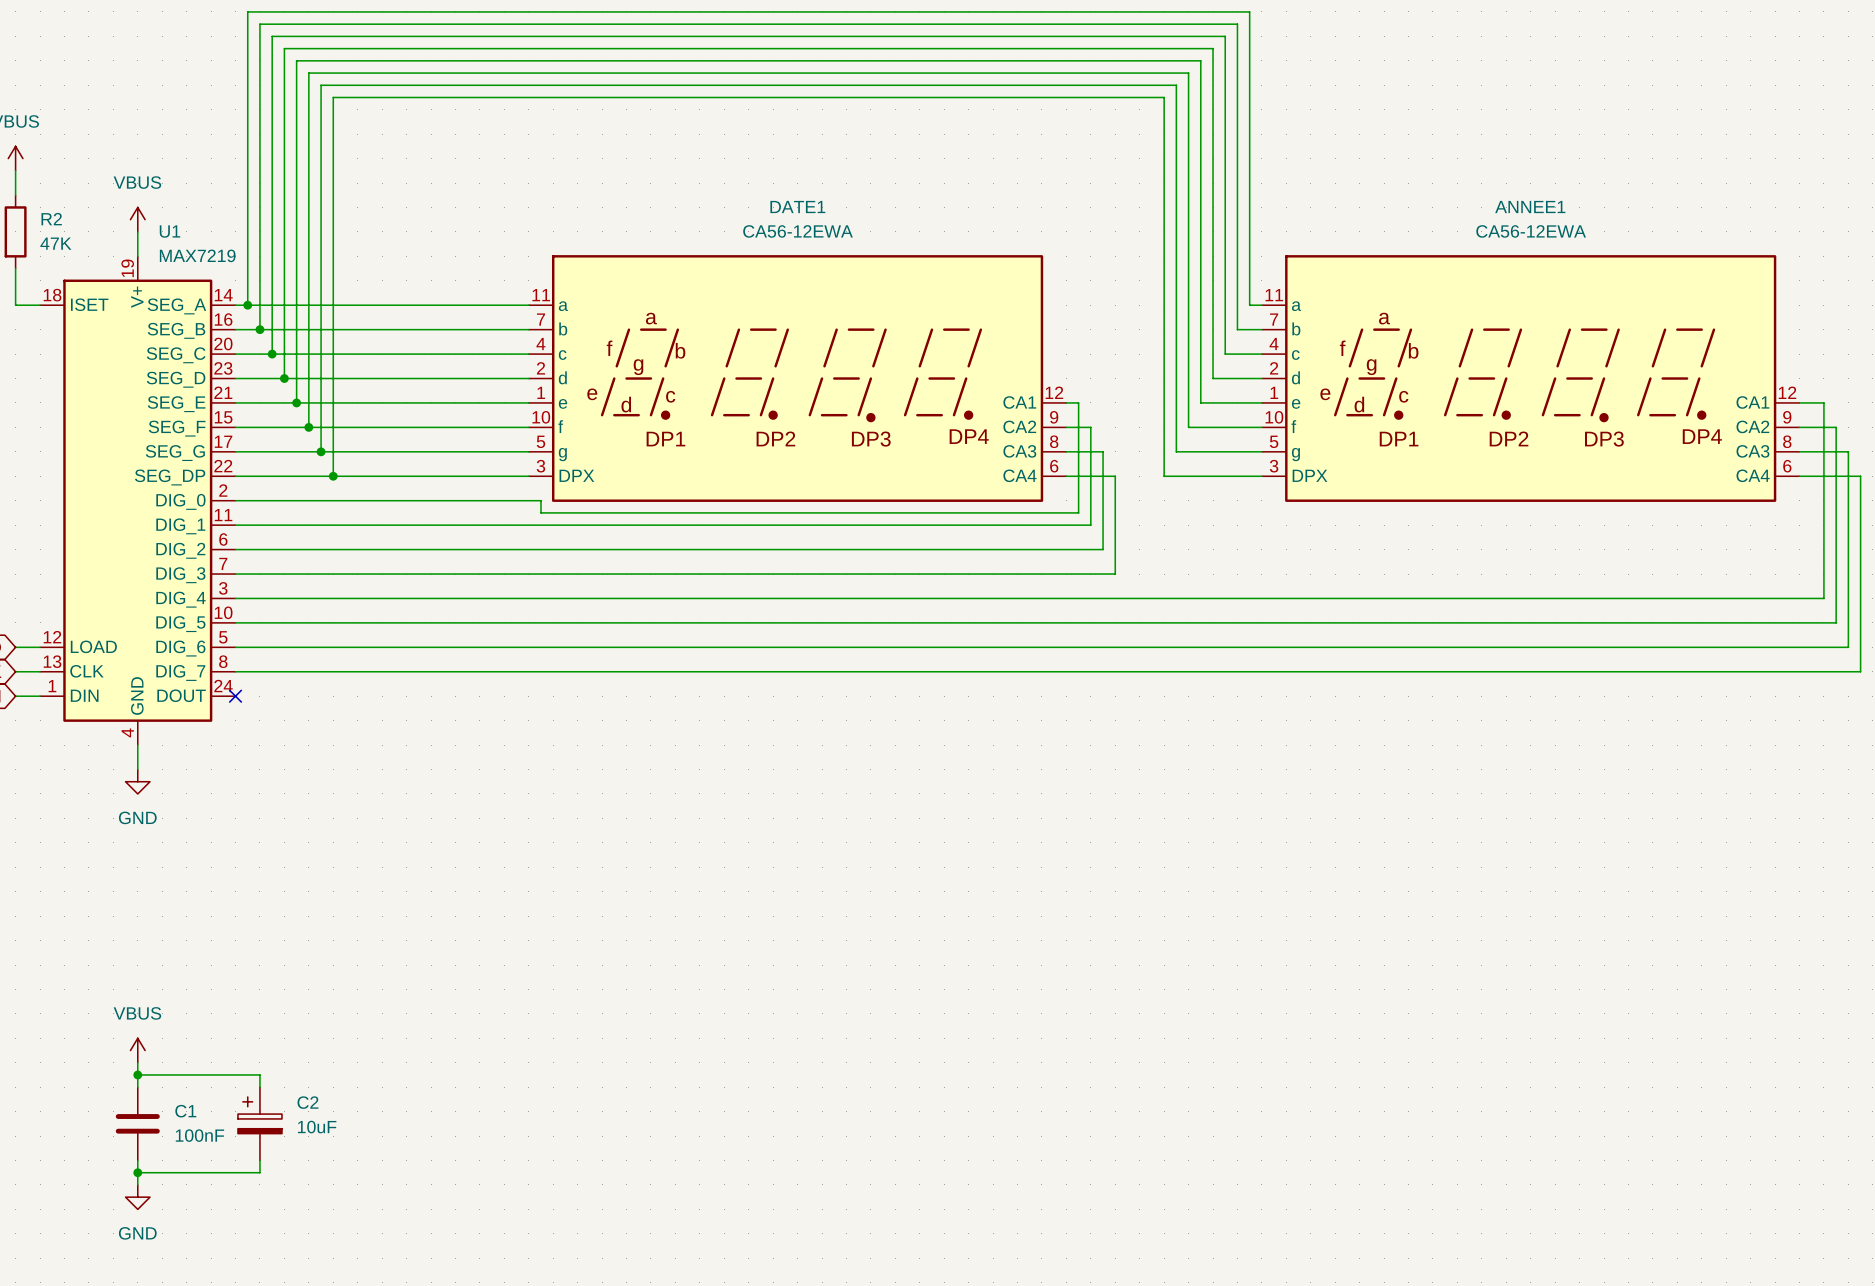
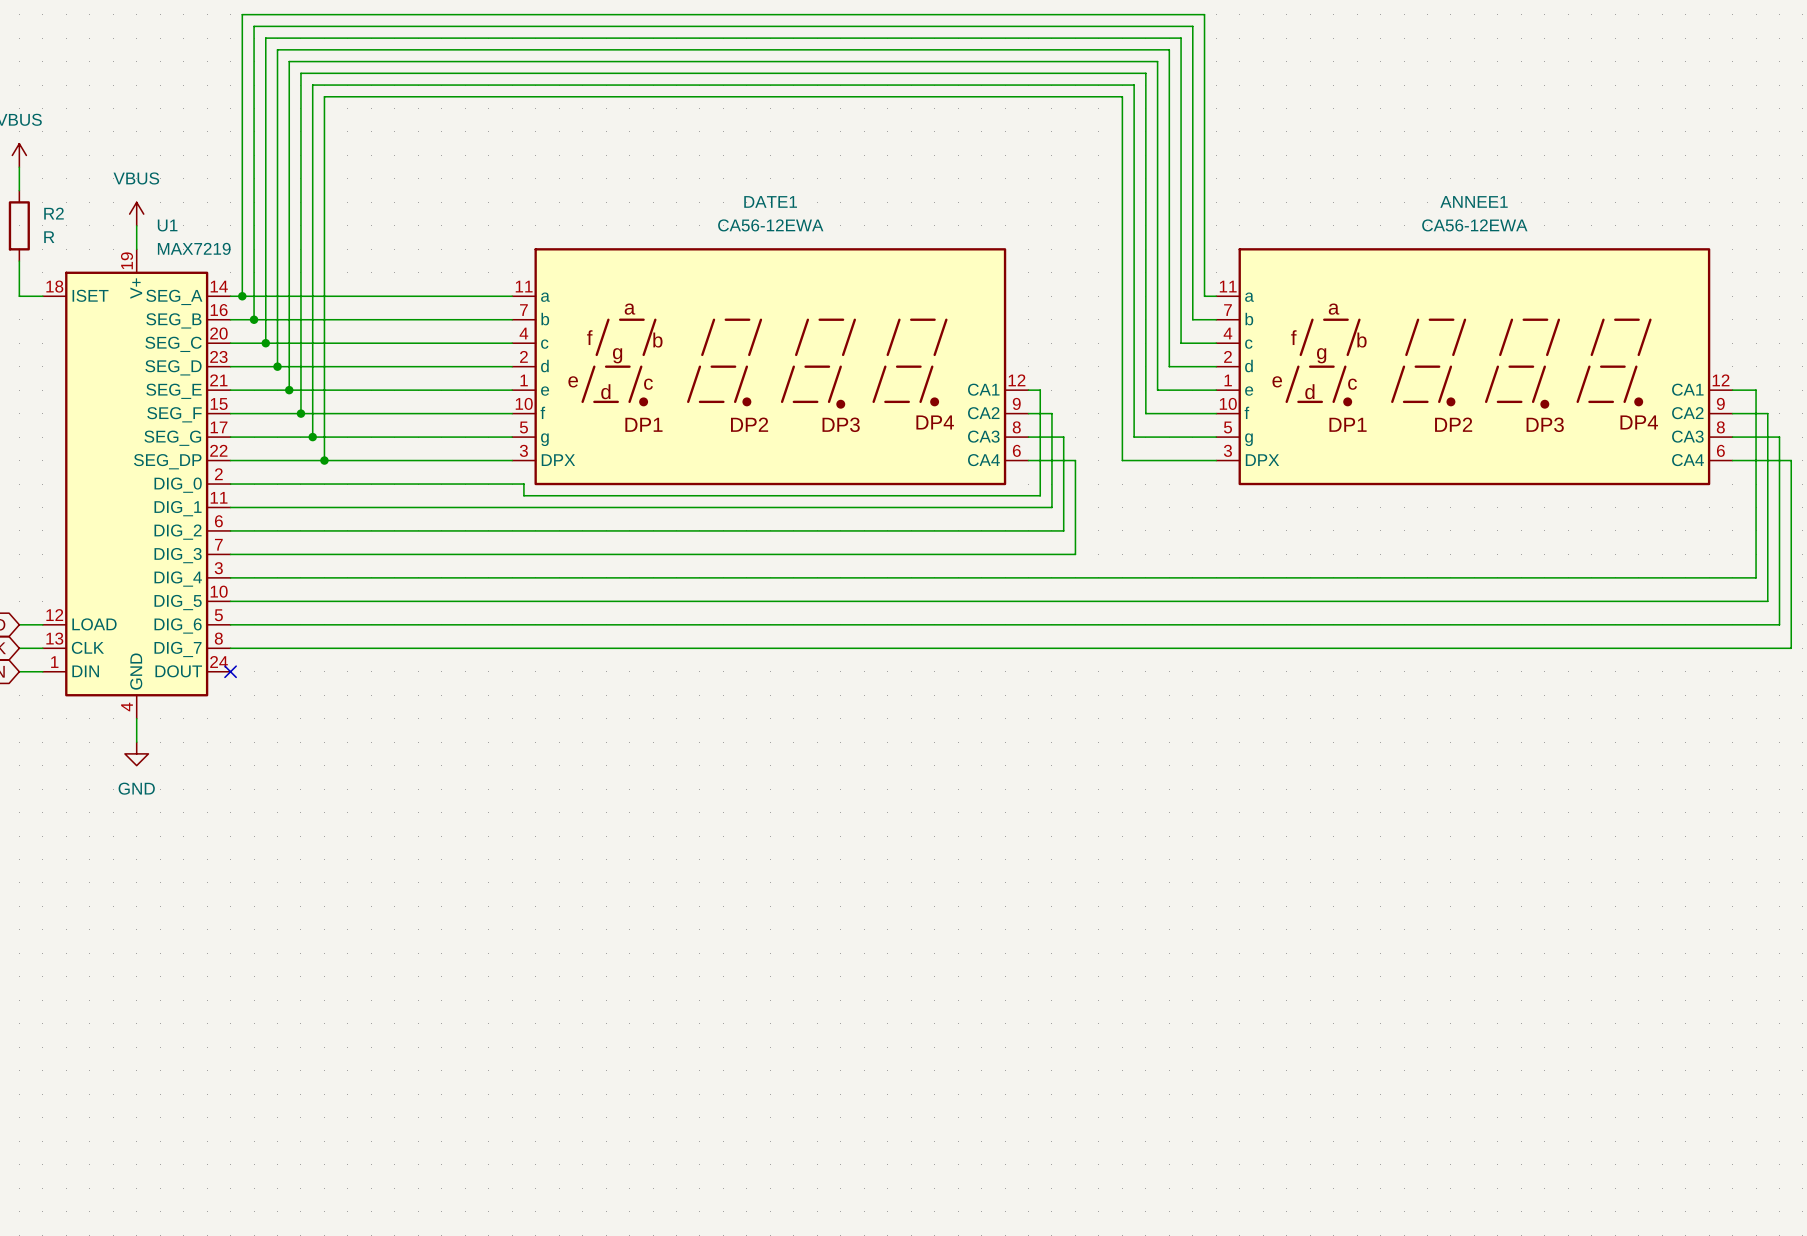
R2 value: 47K (55, 243) -> R (49, 237)
power symbol: VBUS (137, 1050) -> none
wire: (137, 1062) (137, 1087) -> none
wire: (137, 1074) (259, 1074) (259, 1087) -> none
junction: (137, 1074) -> none
C1: 100nF (137, 1123) -> none
C2: 10uF (259, 1123) -> none
wire: (137, 1160) (137, 1184) -> none
wire: (259, 1160) (259, 1172) (137, 1172) -> none
junction: (137, 1172) -> none
power symbol: GND (137, 1197) -> none

